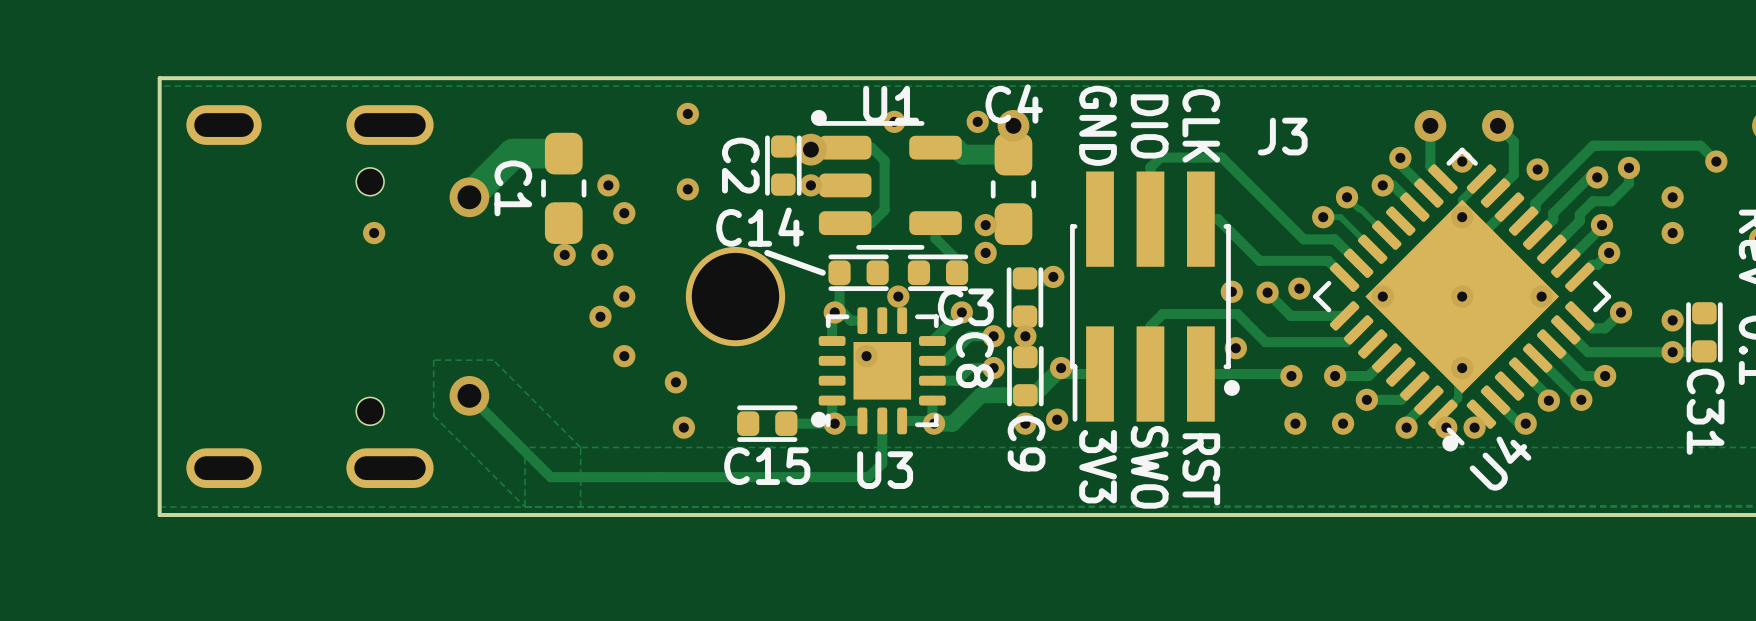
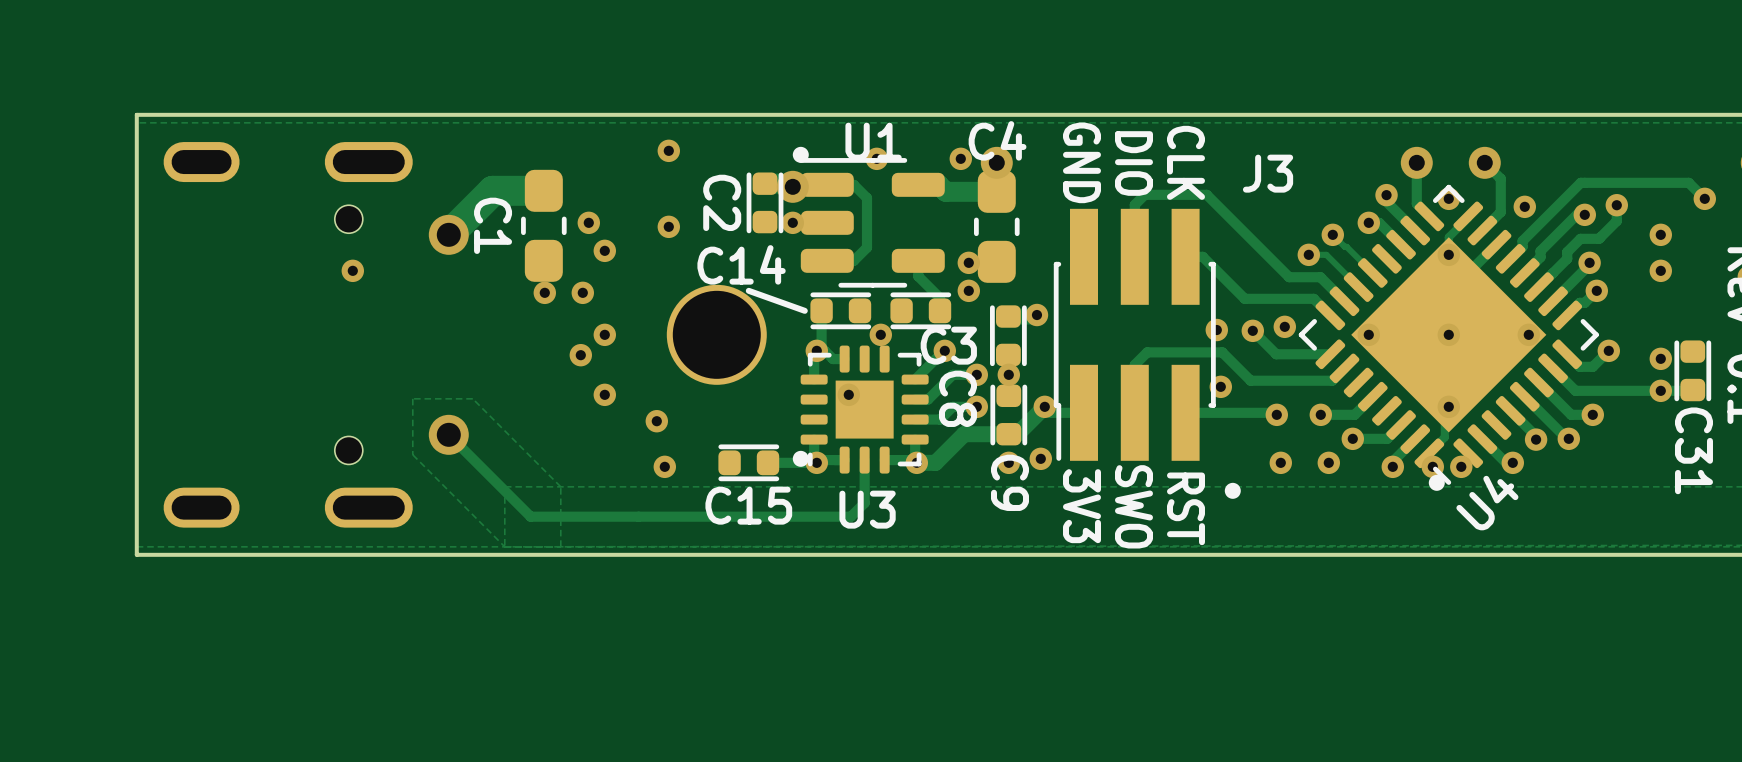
drawing position: (1231, 387) -> (1232, 490)

